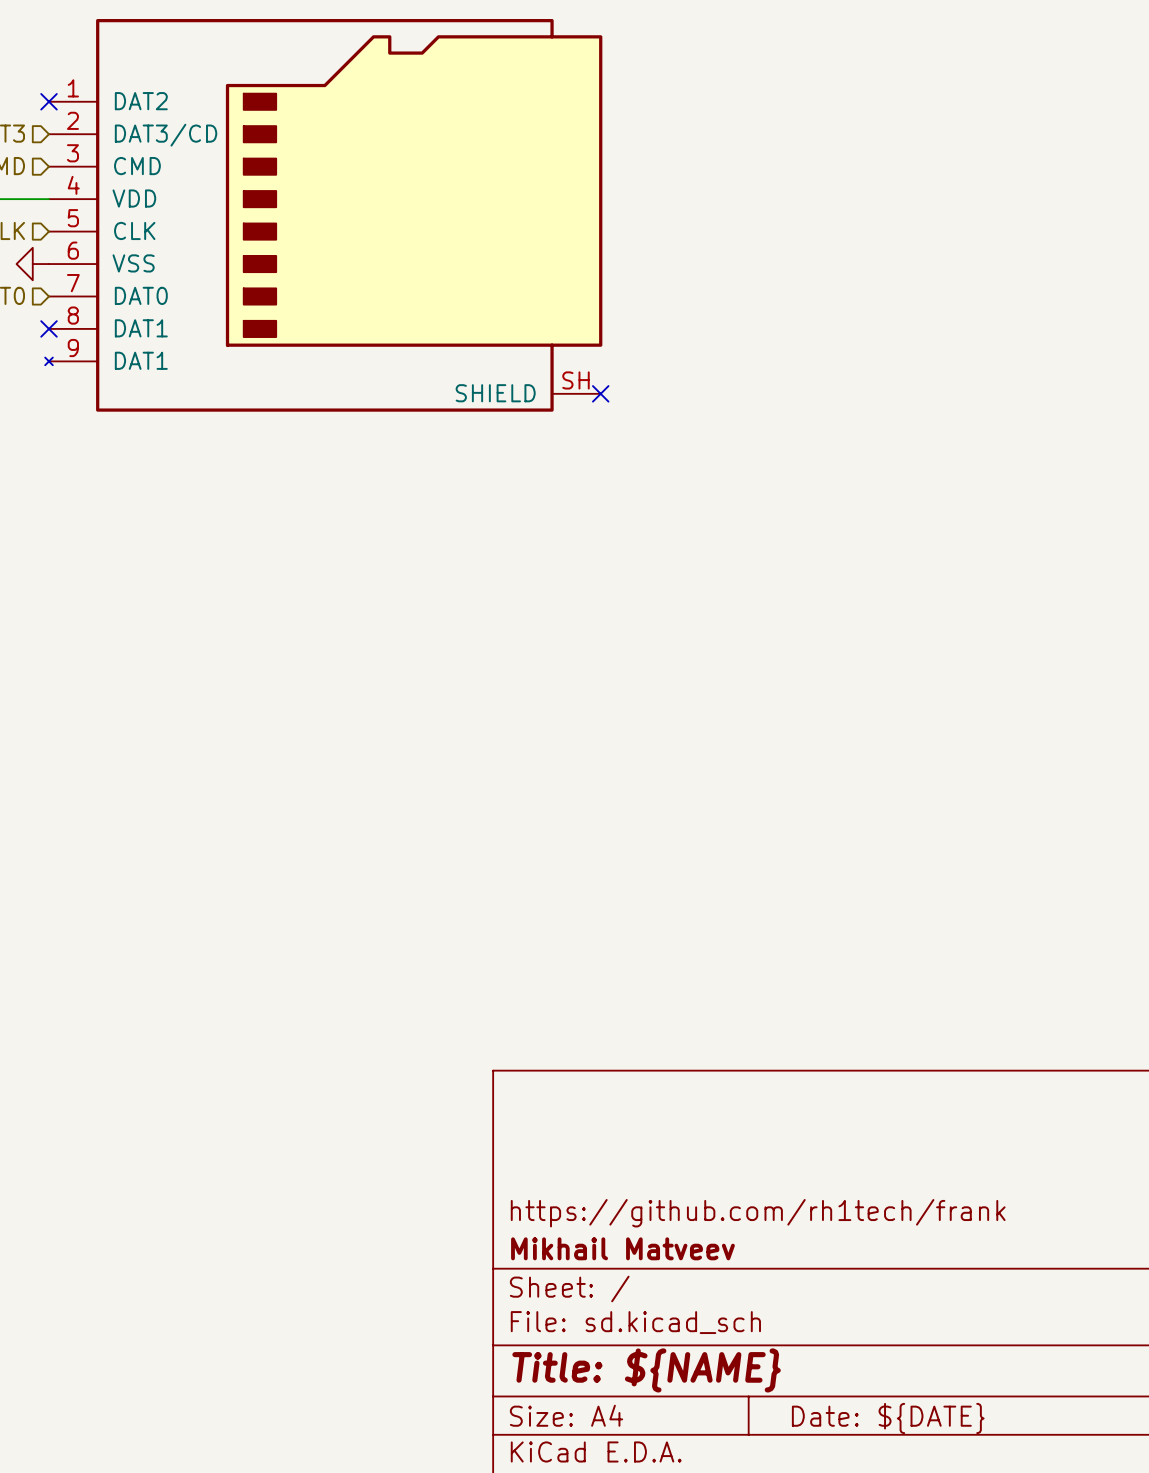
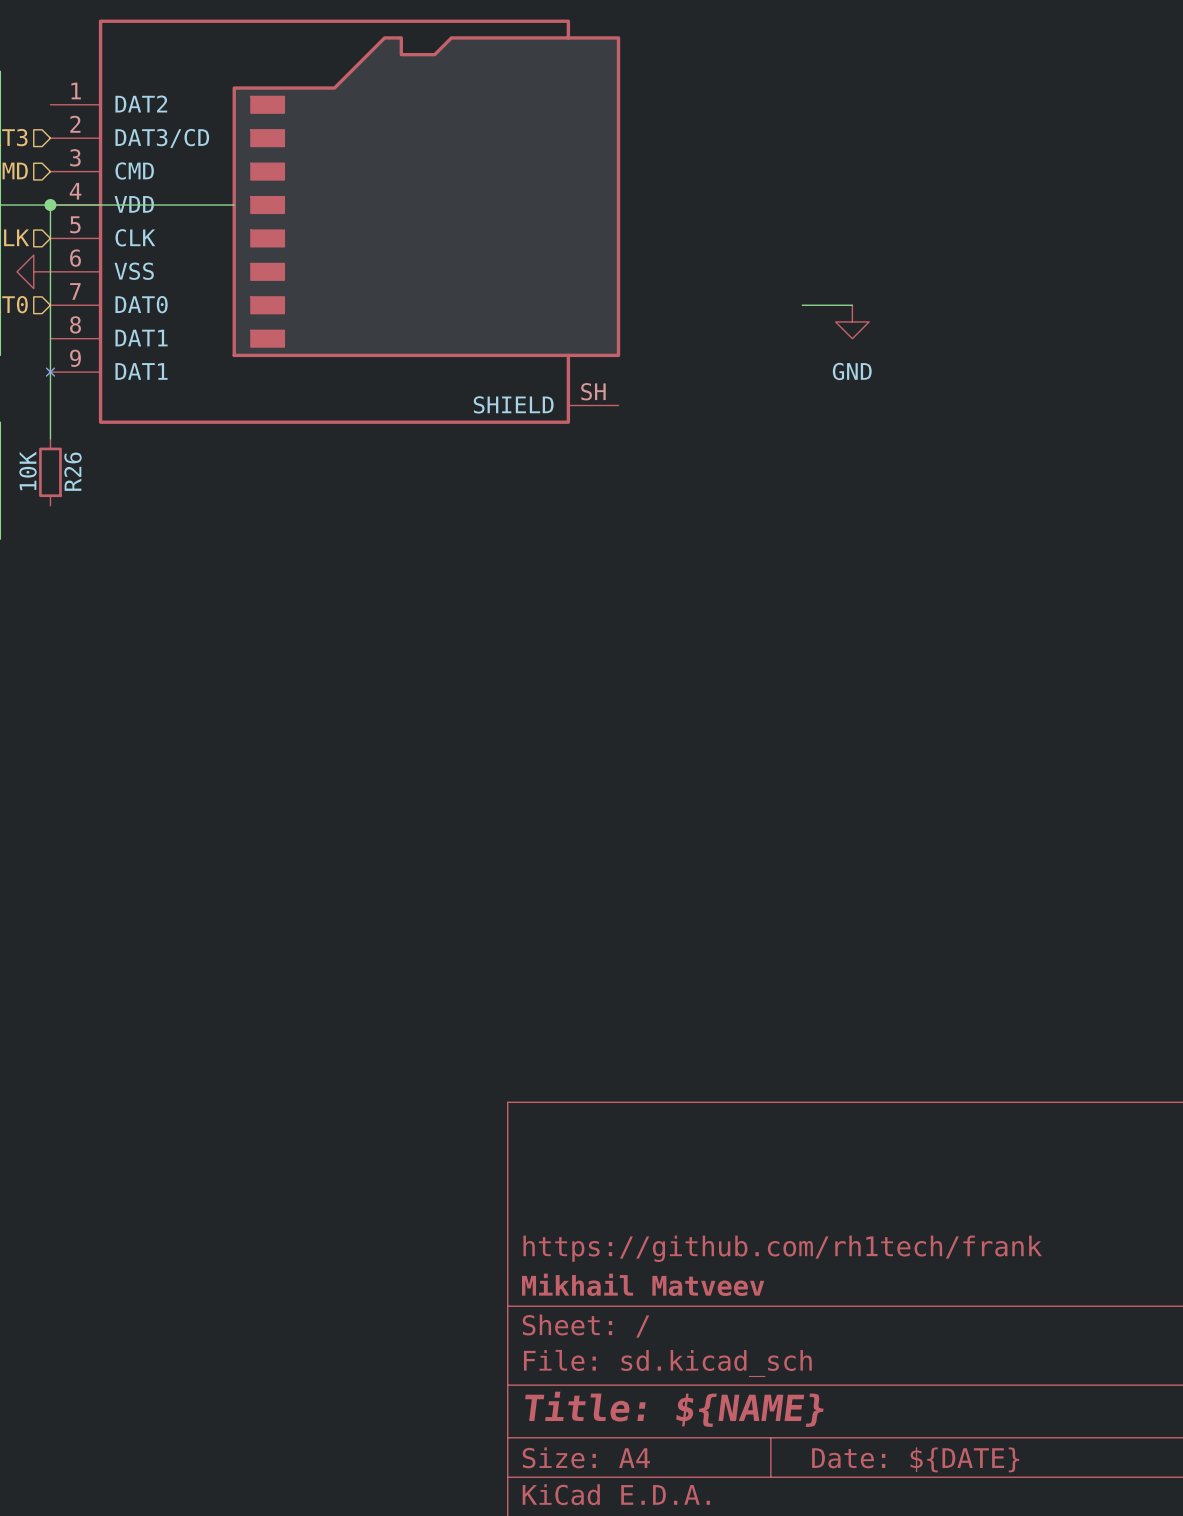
wire: none -> (0, 71) (0, 355)
no-connect mark: (49, 101) -> none
junction: none -> (50, 205)
wire: none -> (234, 205) (50, 205) (50, 438)
wire: none -> (802, 305) (852, 305)
power symbol: none -> GND (852, 321)
no-connect mark: (49, 328) -> none
no-connect mark: (600, 393) -> none
wire: none -> (0, 422) (0, 539)
R26: none -> 10K (50, 472)

